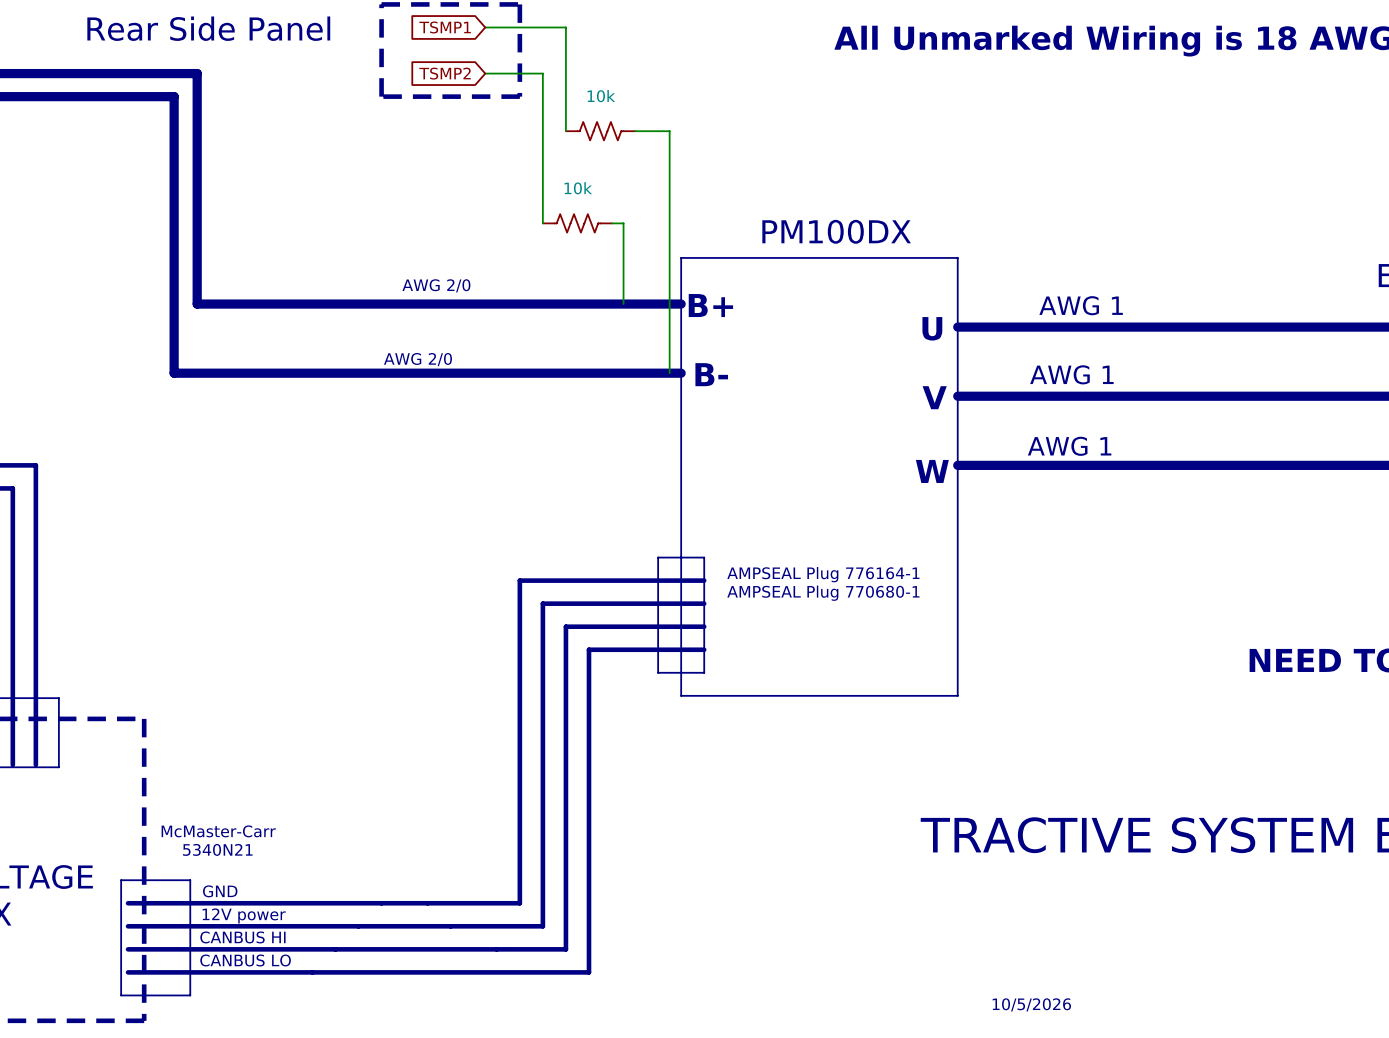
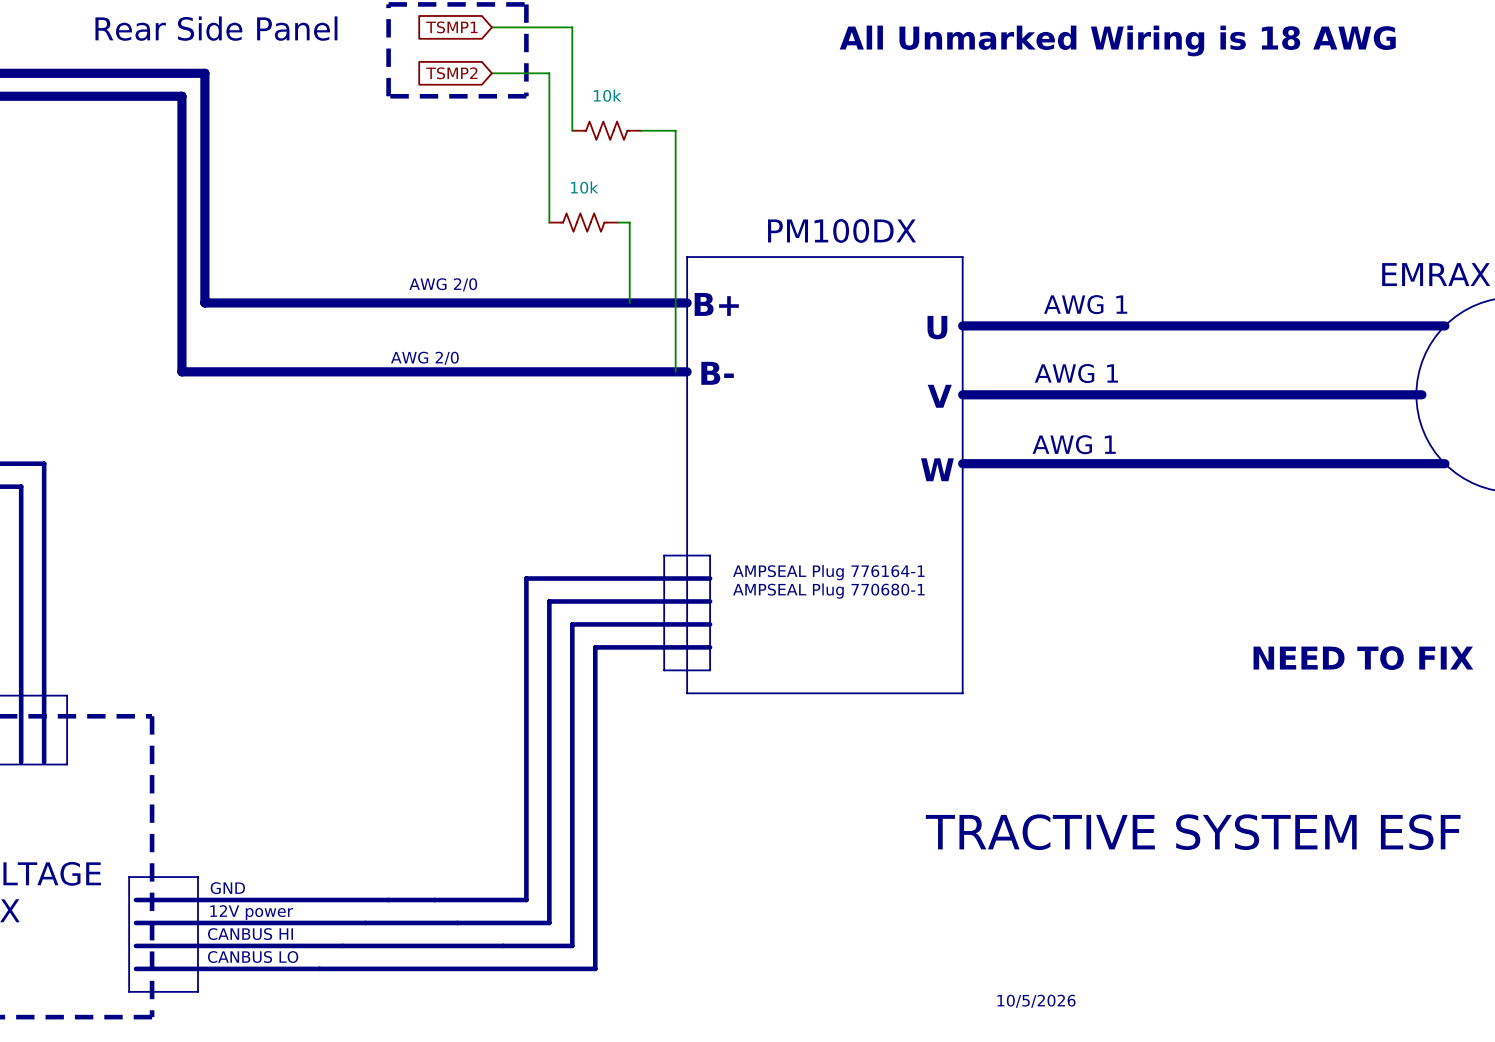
text: McMaster-Carr (218, 831) -> none
text: 5340N21 (217, 849) -> none

